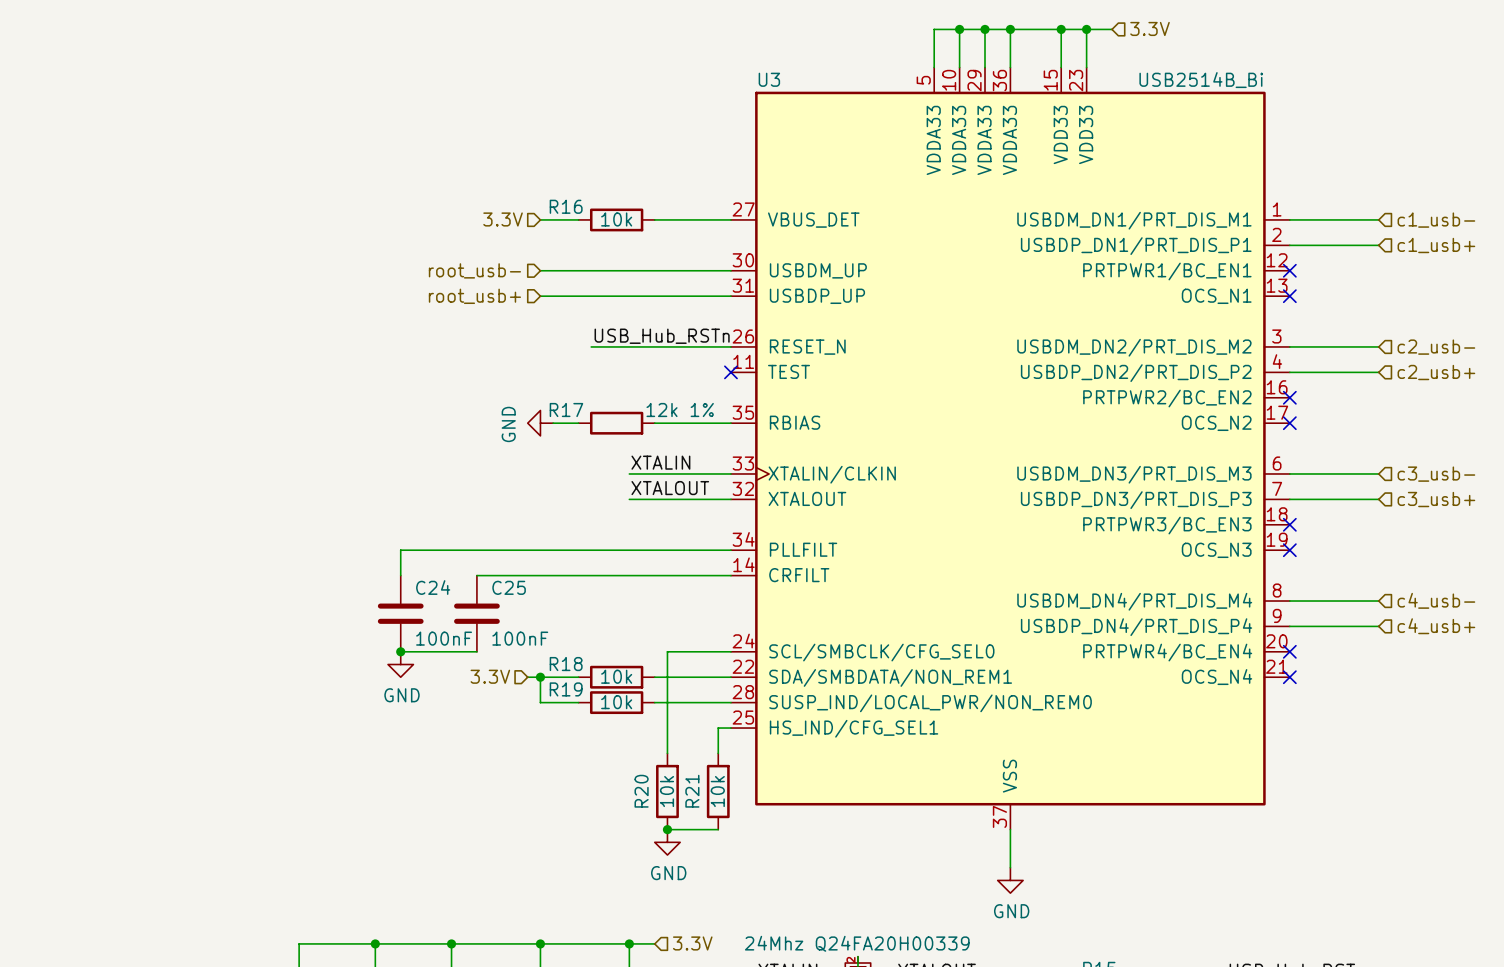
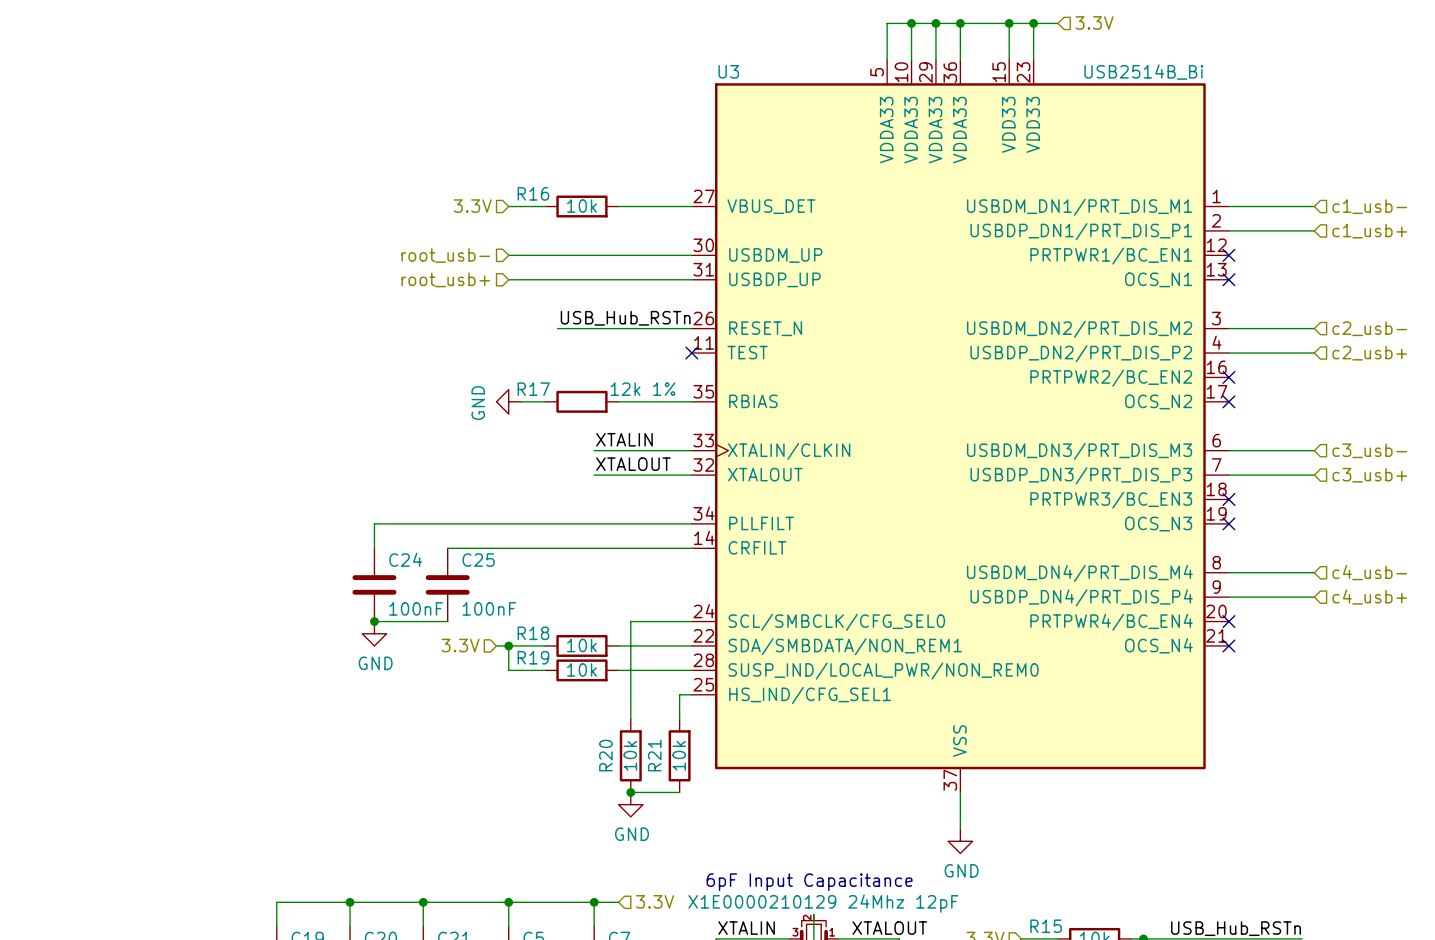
text: none -> 6pF Input Capacitance (809, 882)
part value: 24Mhz Q24FA20H00339 (857, 943) -> X1E0000210129 24Mhz 12pF (823, 903)

